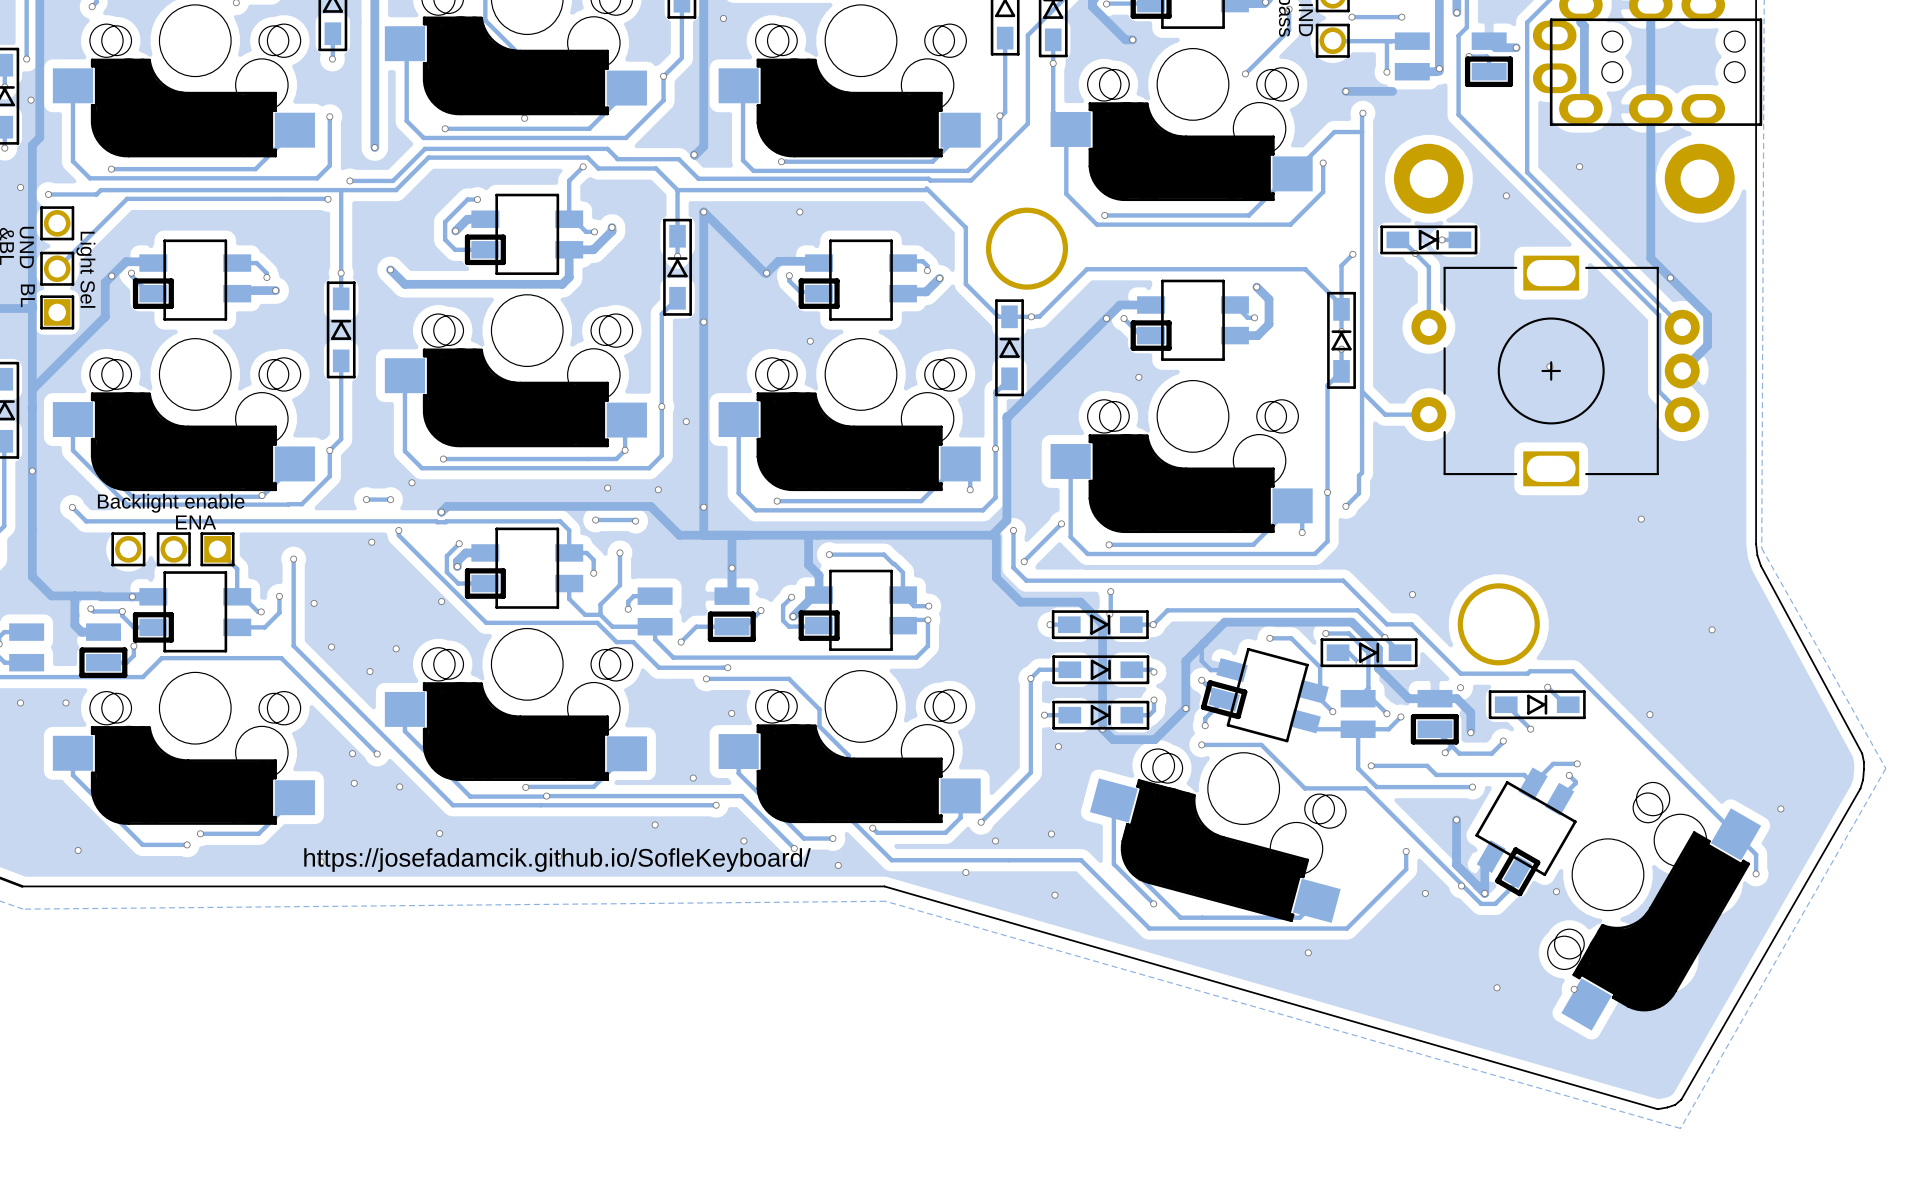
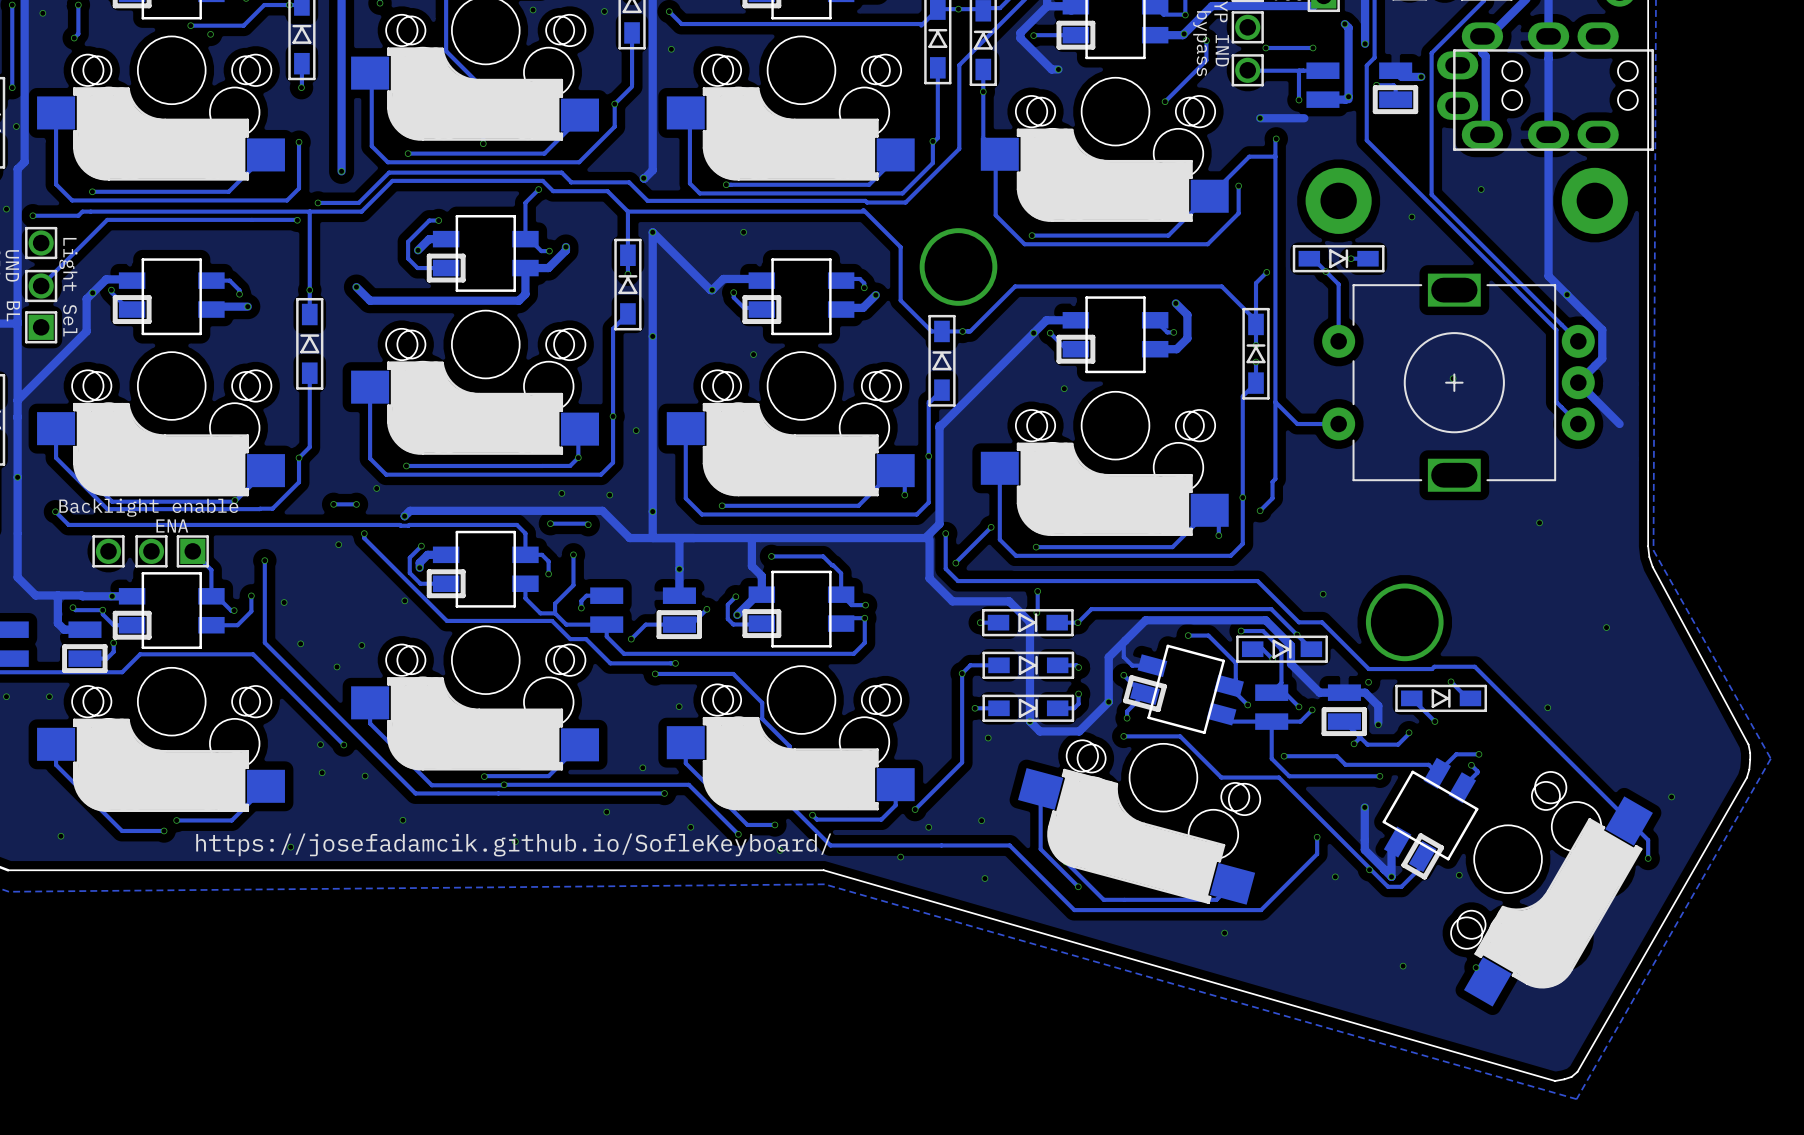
track: none -> (1578, 382) (1619, 424)

